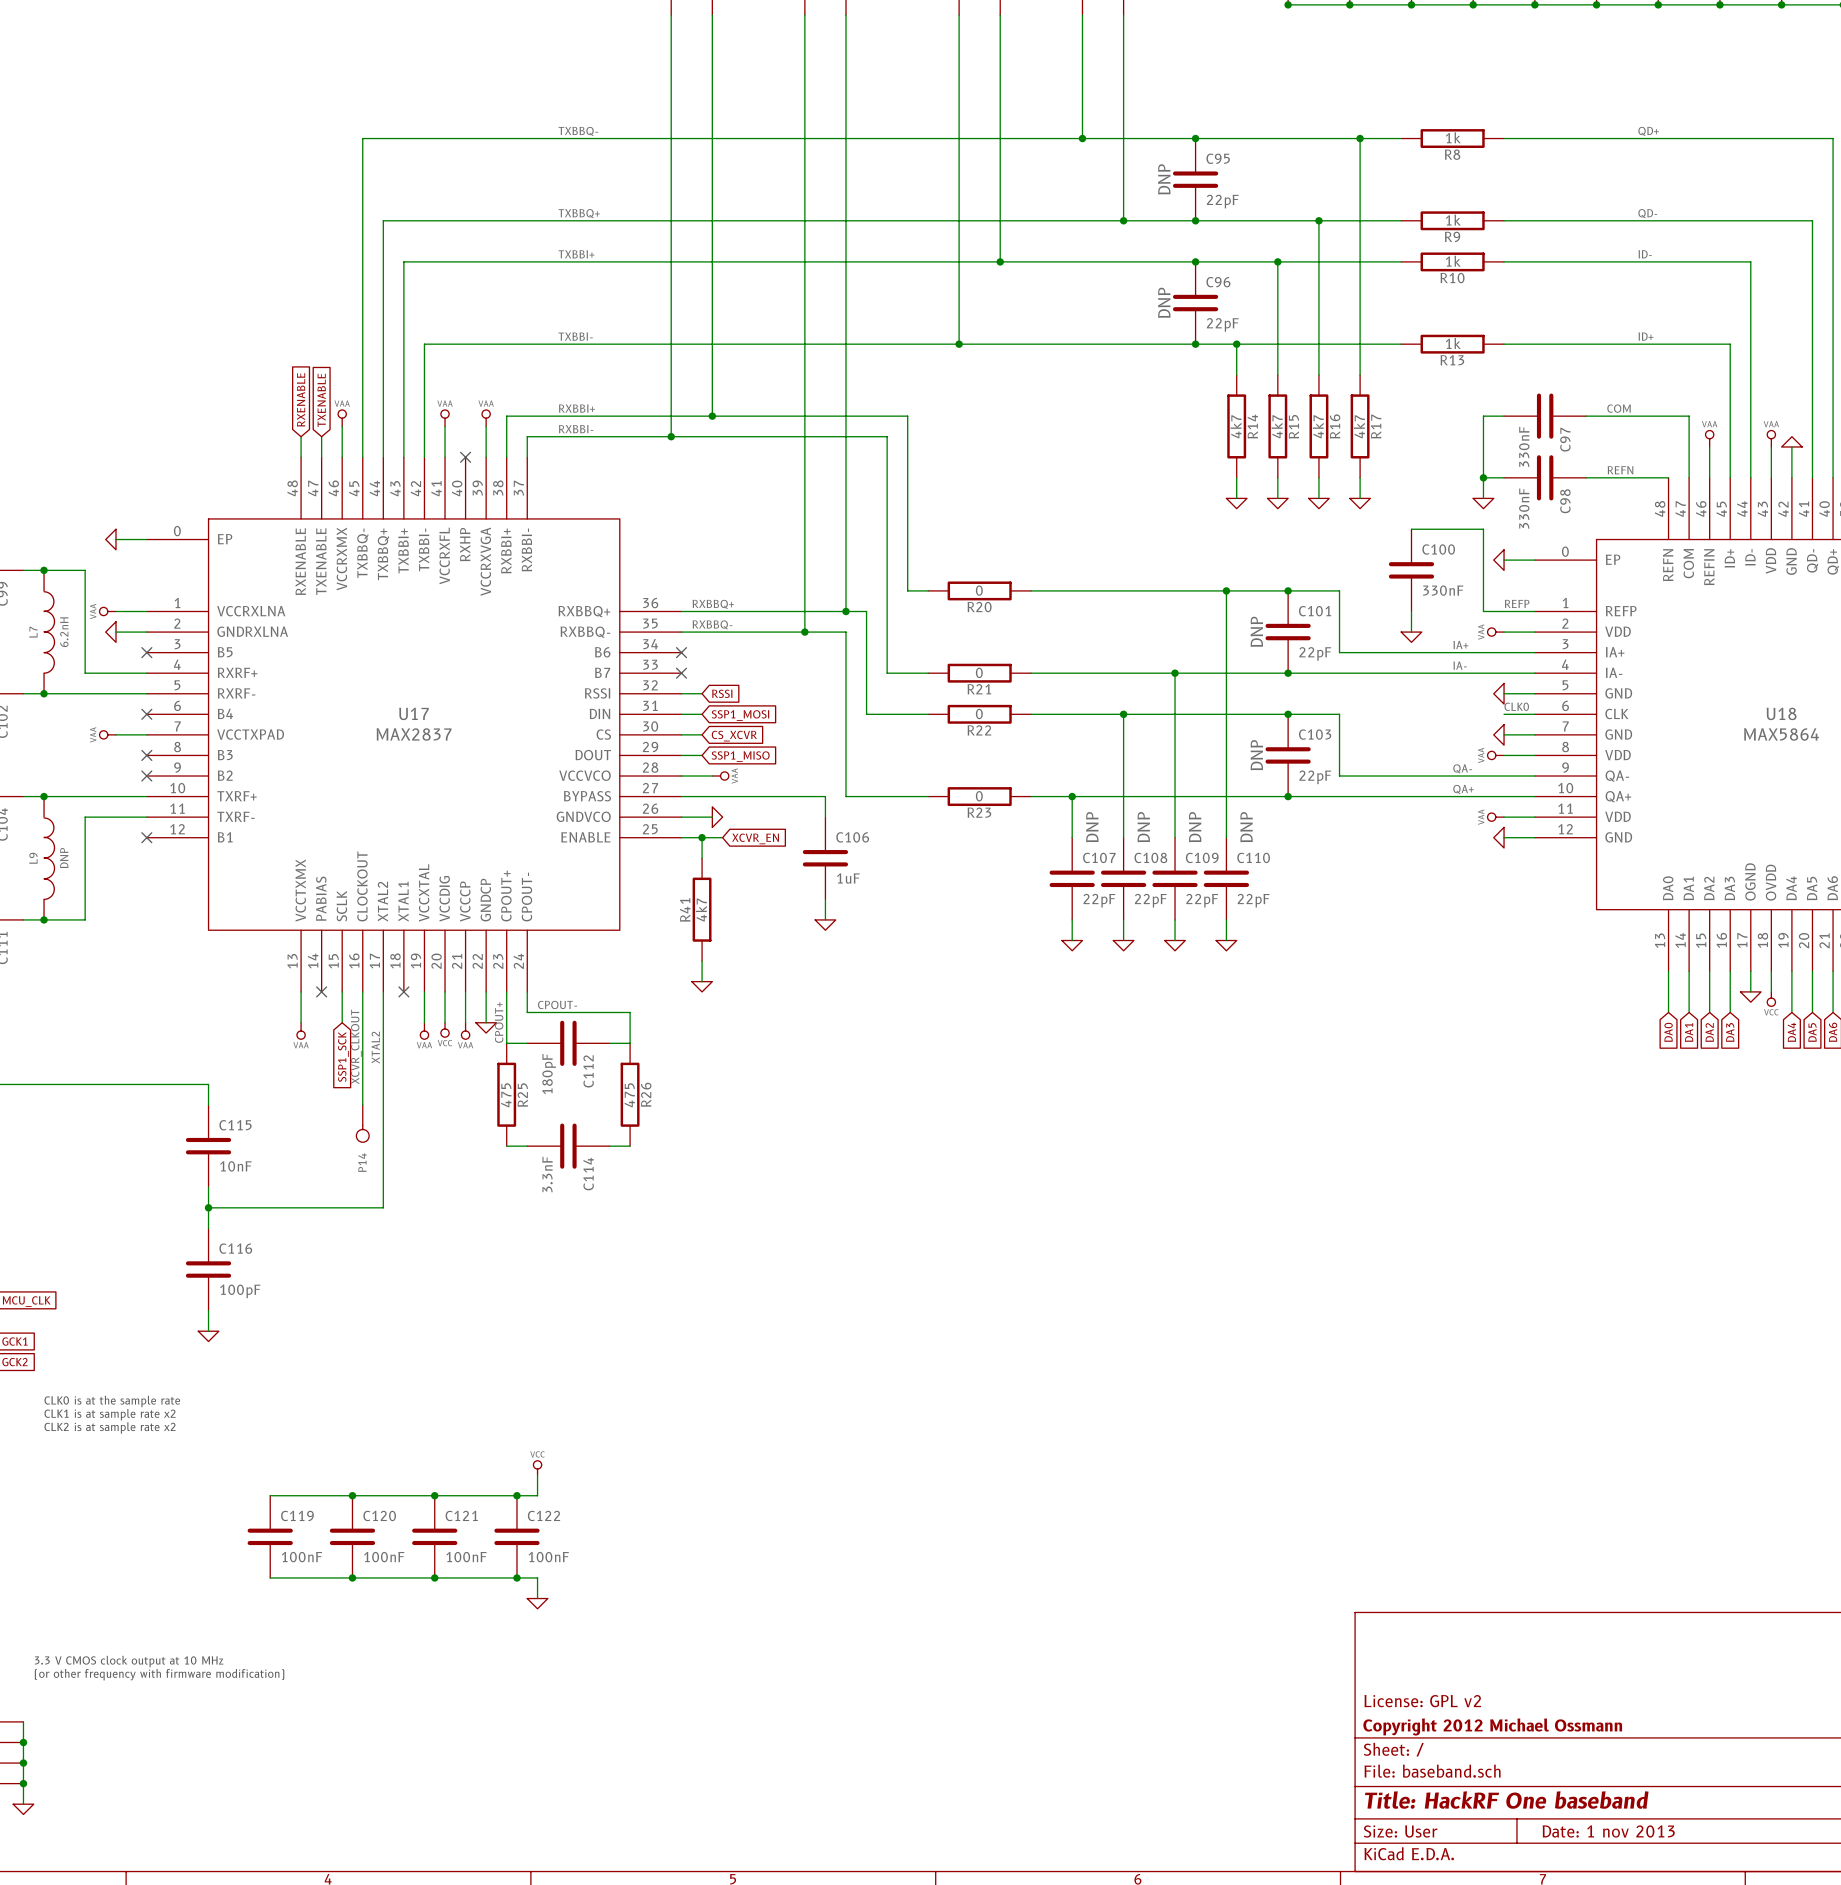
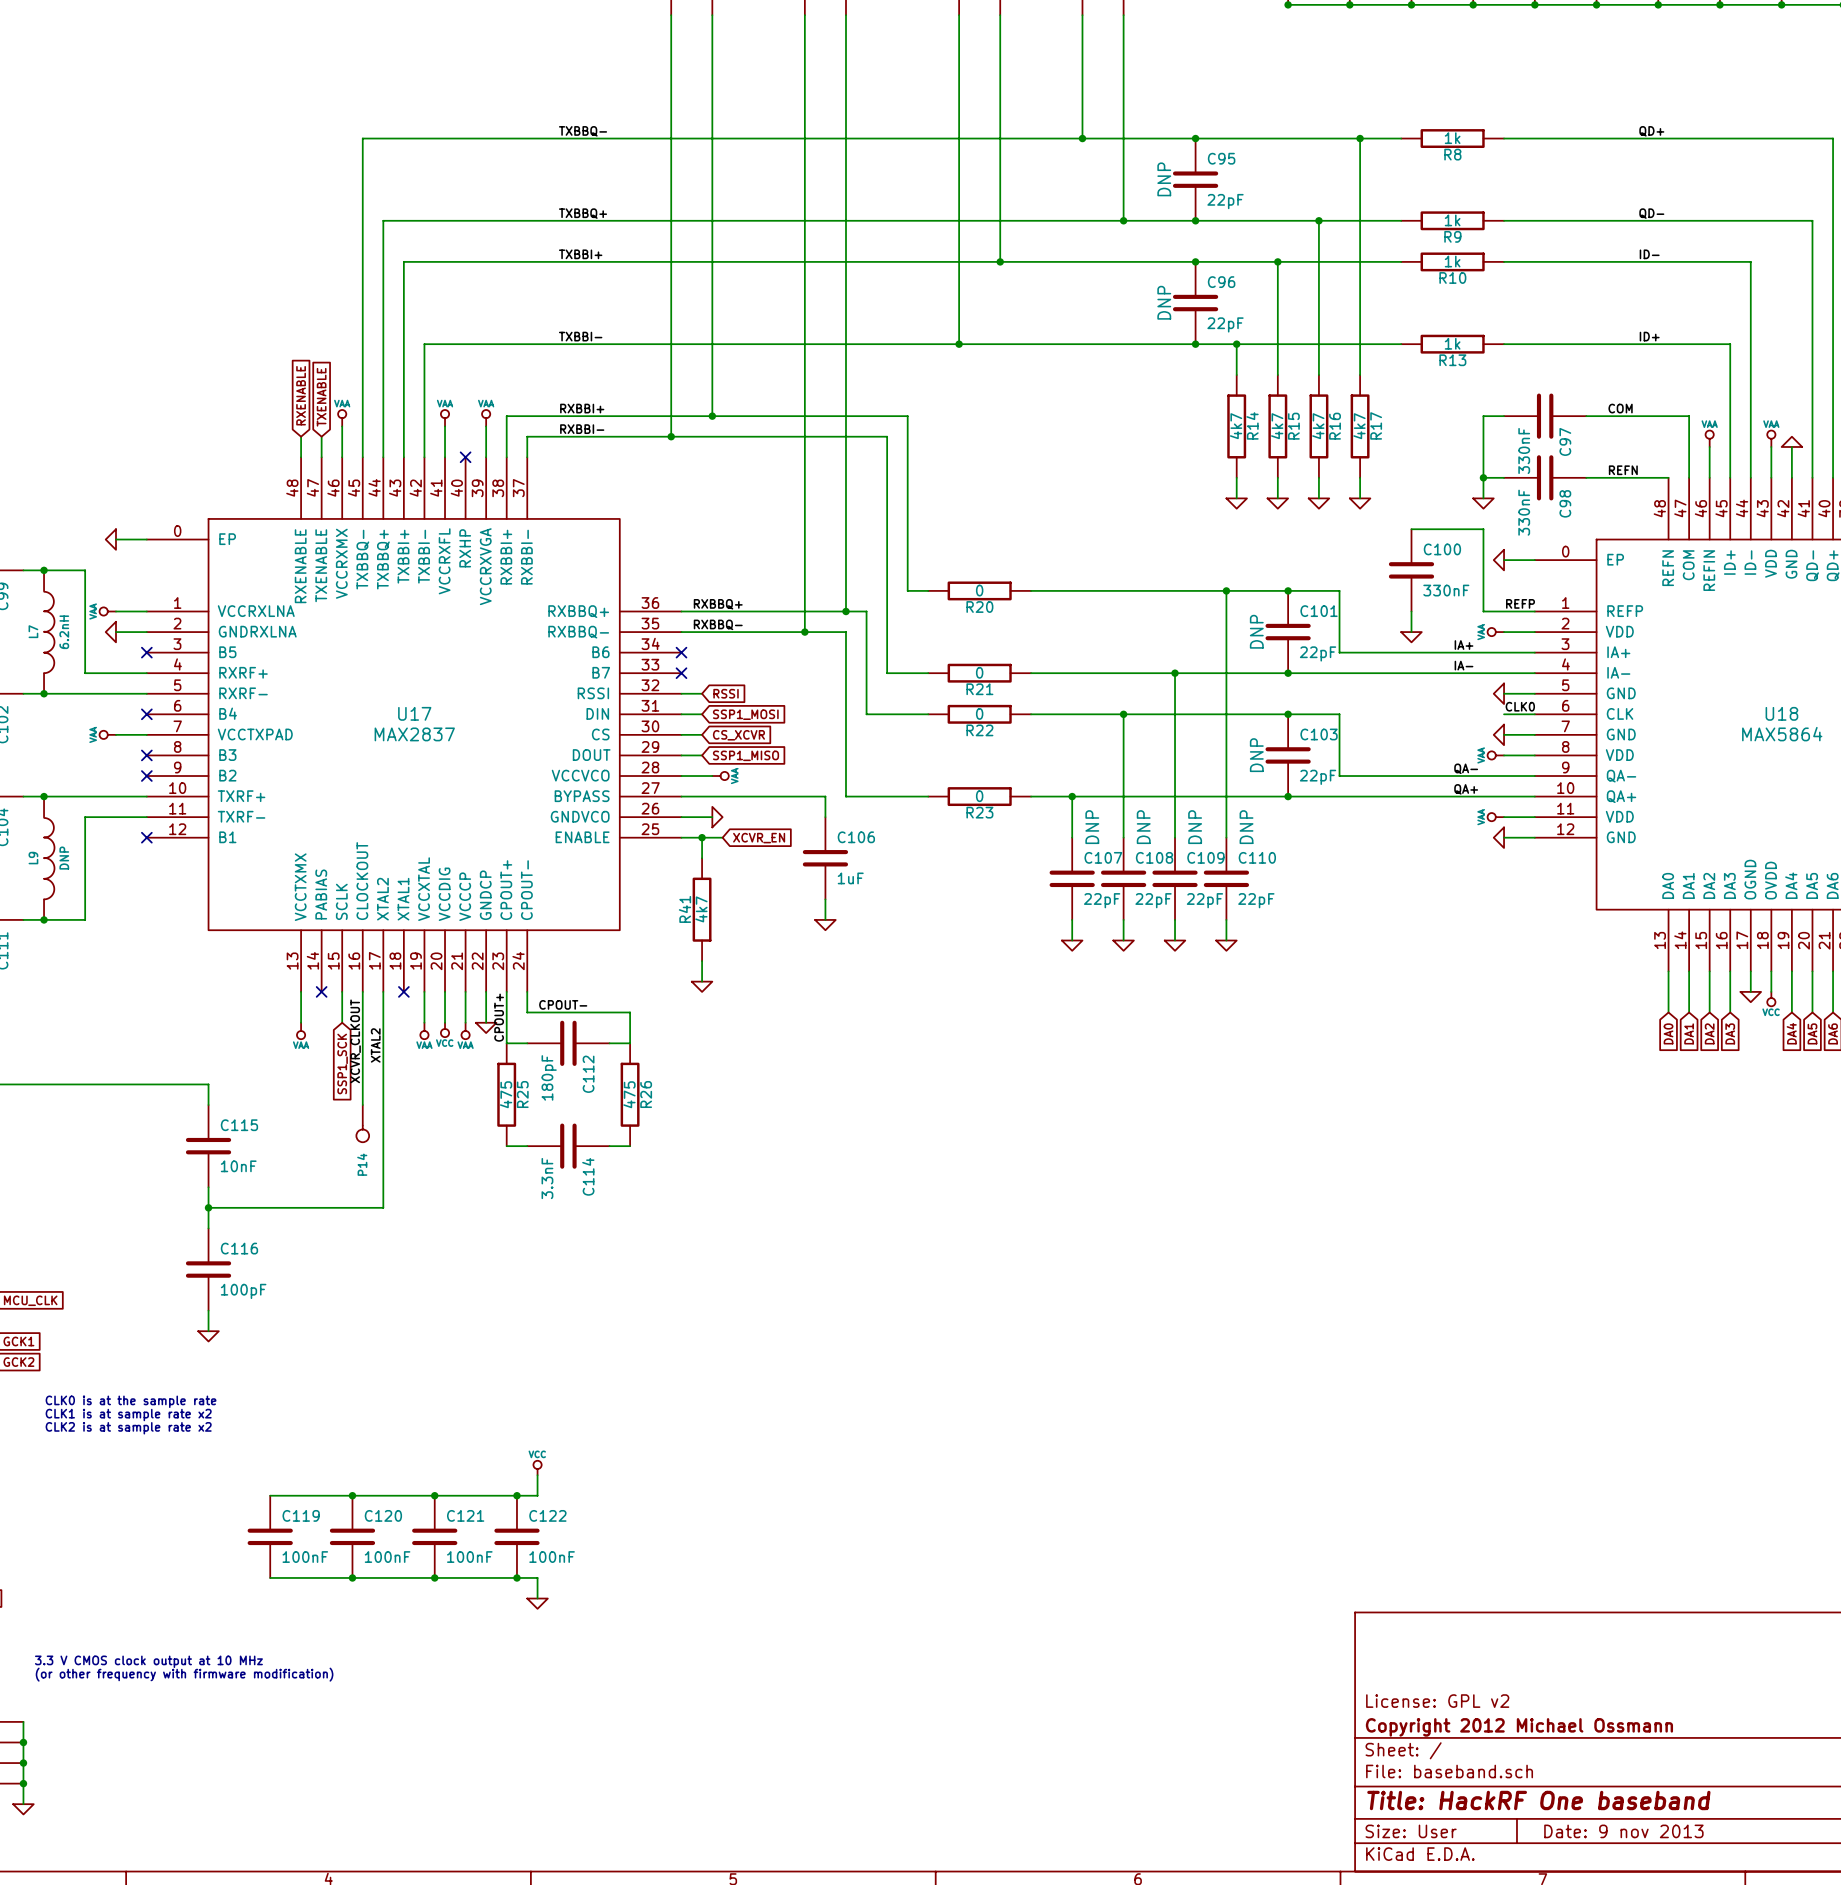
title block: Date: 1 nov 2013 (1608, 1831) -> Date: 9 nov 2013 (1623, 1831)

